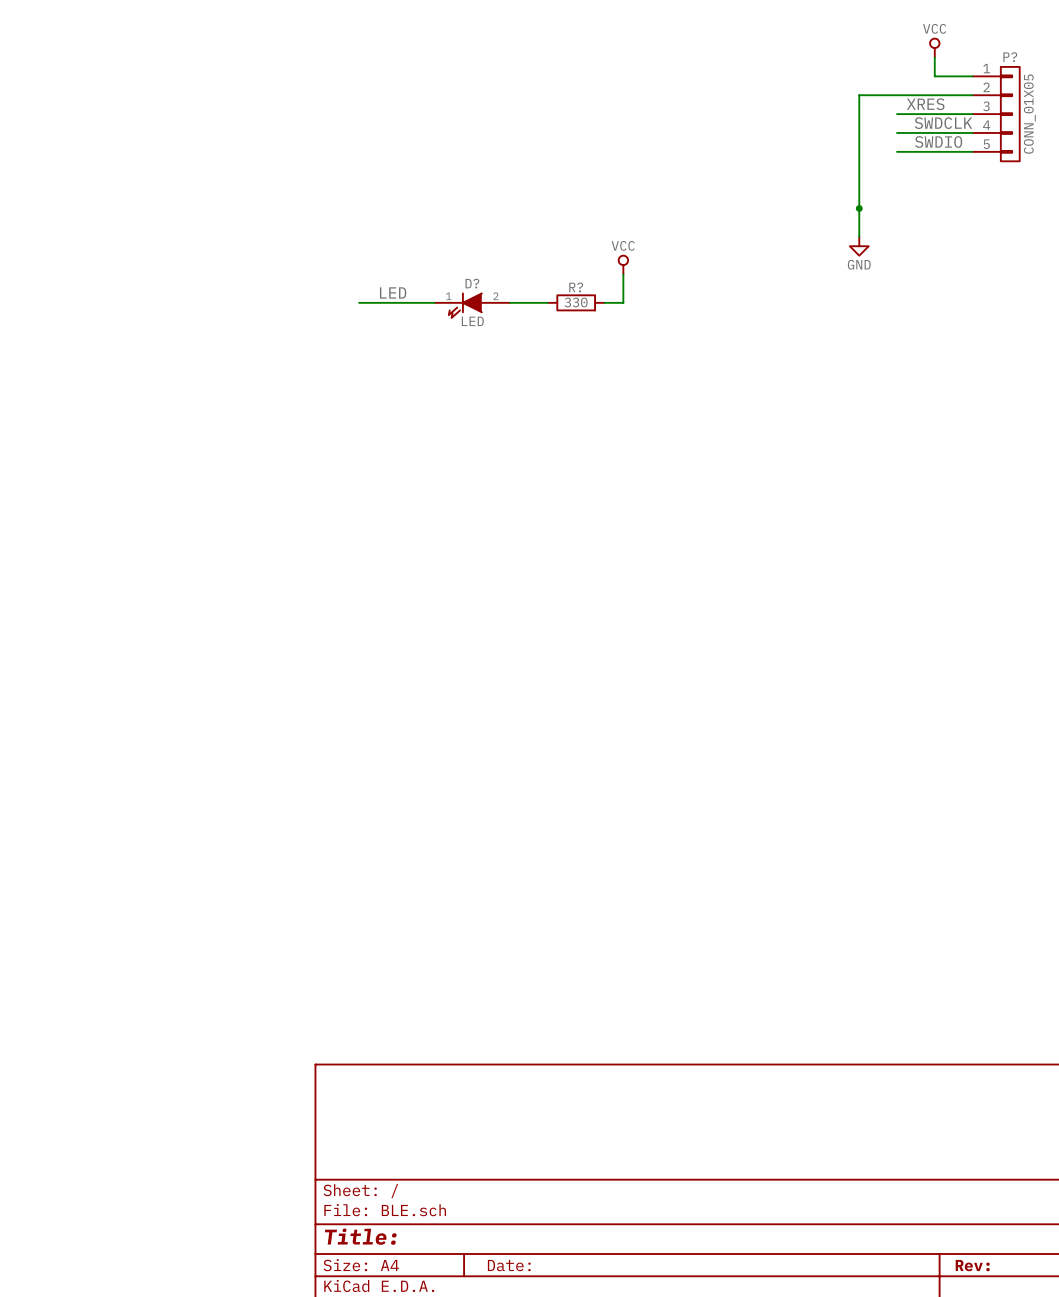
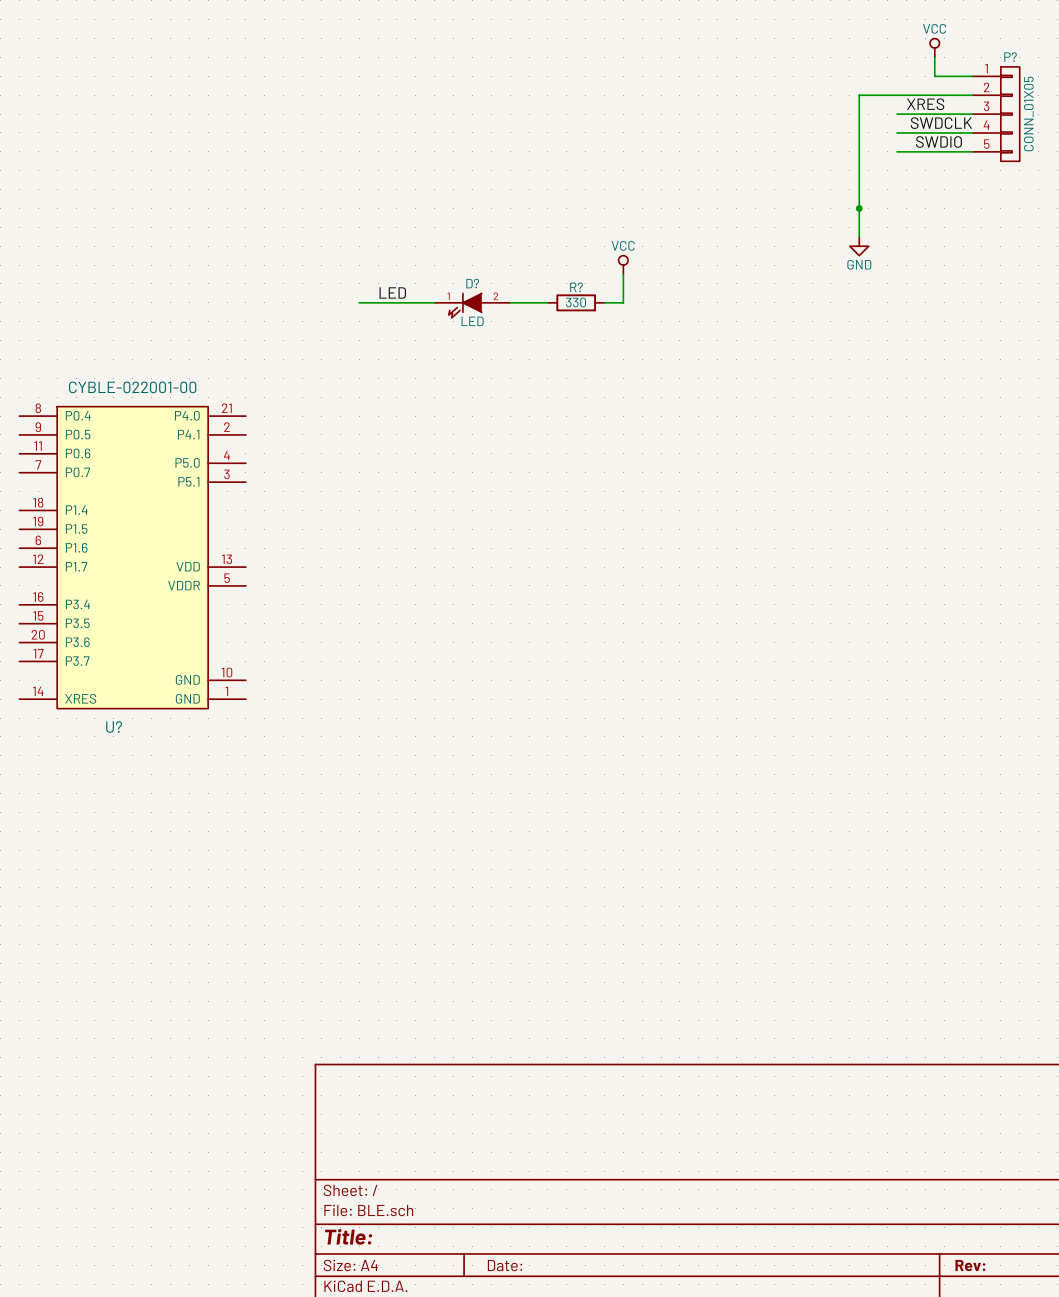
U?: none -> CYBLE-022001-00 (132, 557)

